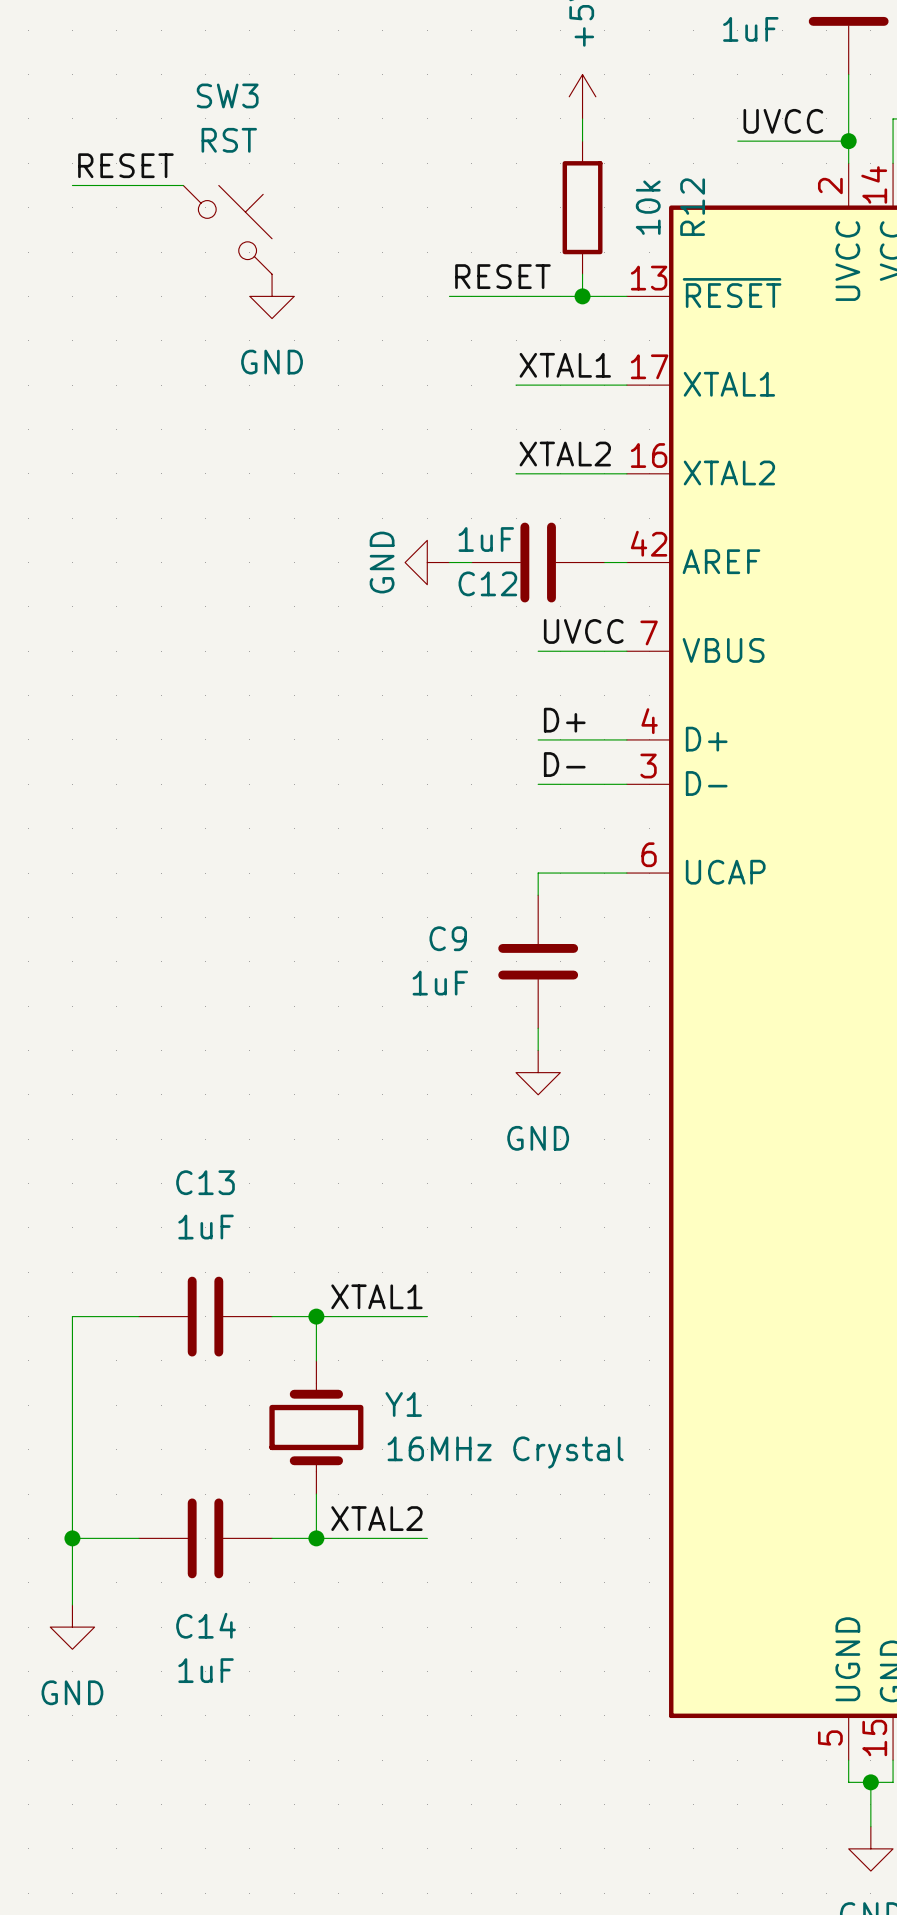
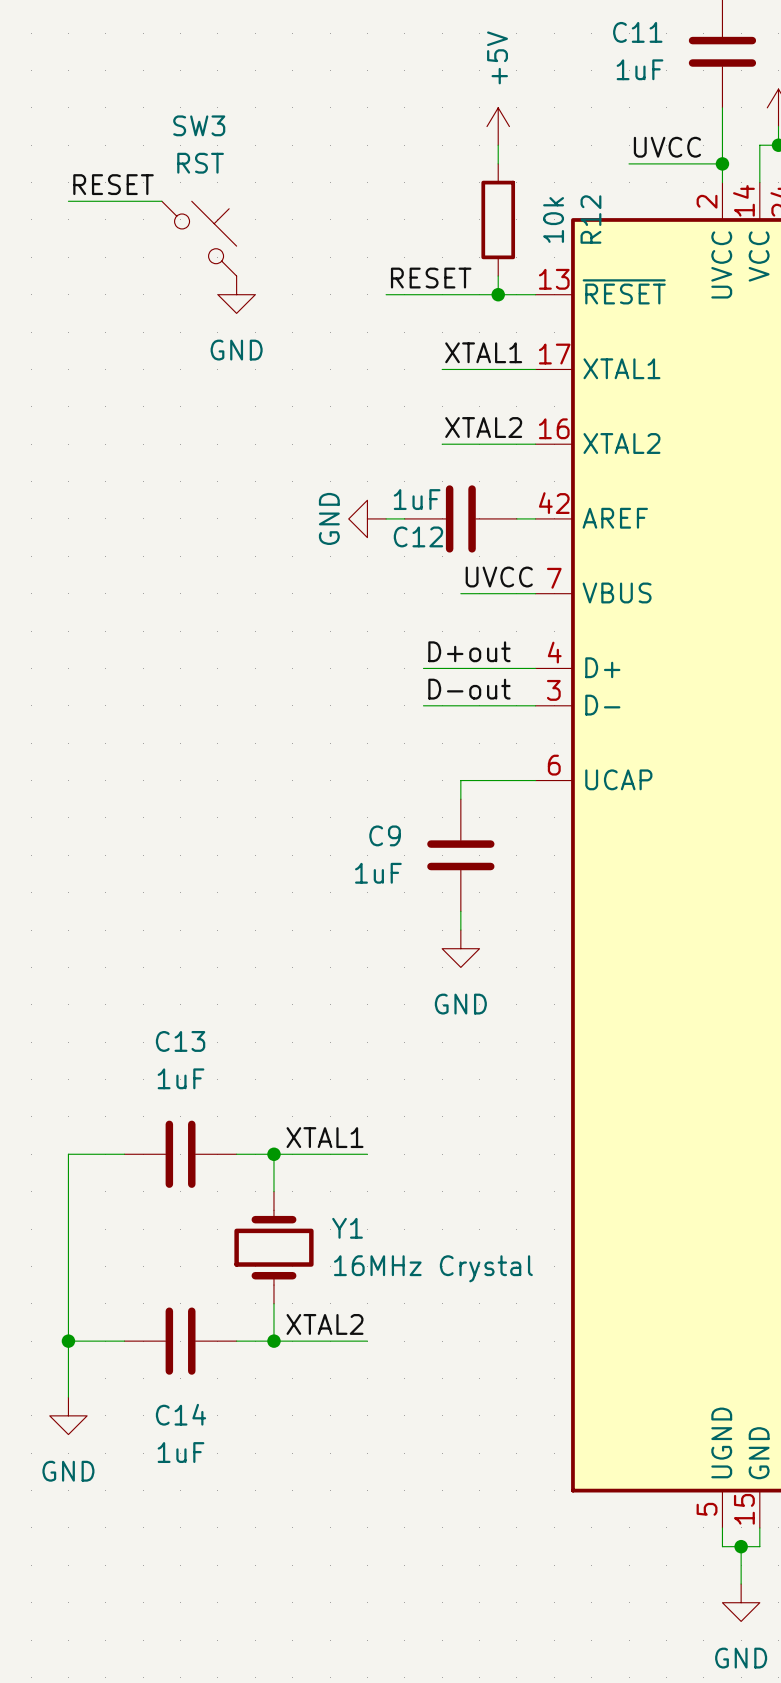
label: none -> D+out (469, 651)
label: D+ (564, 720) -> none
wire: none -> (423, 668) (460, 668)
label: none -> D-out (469, 689)
label: D- (564, 764) -> none
wire: none -> (423, 705) (460, 705)

